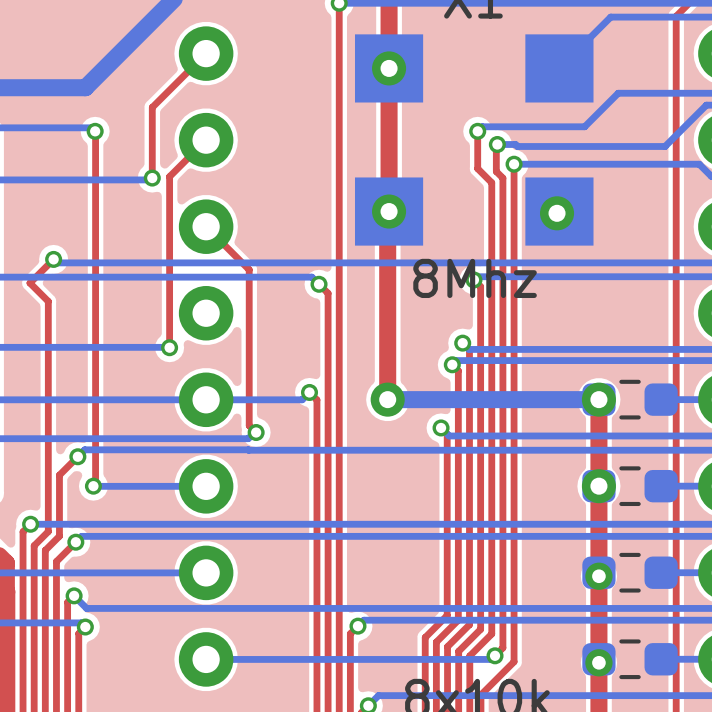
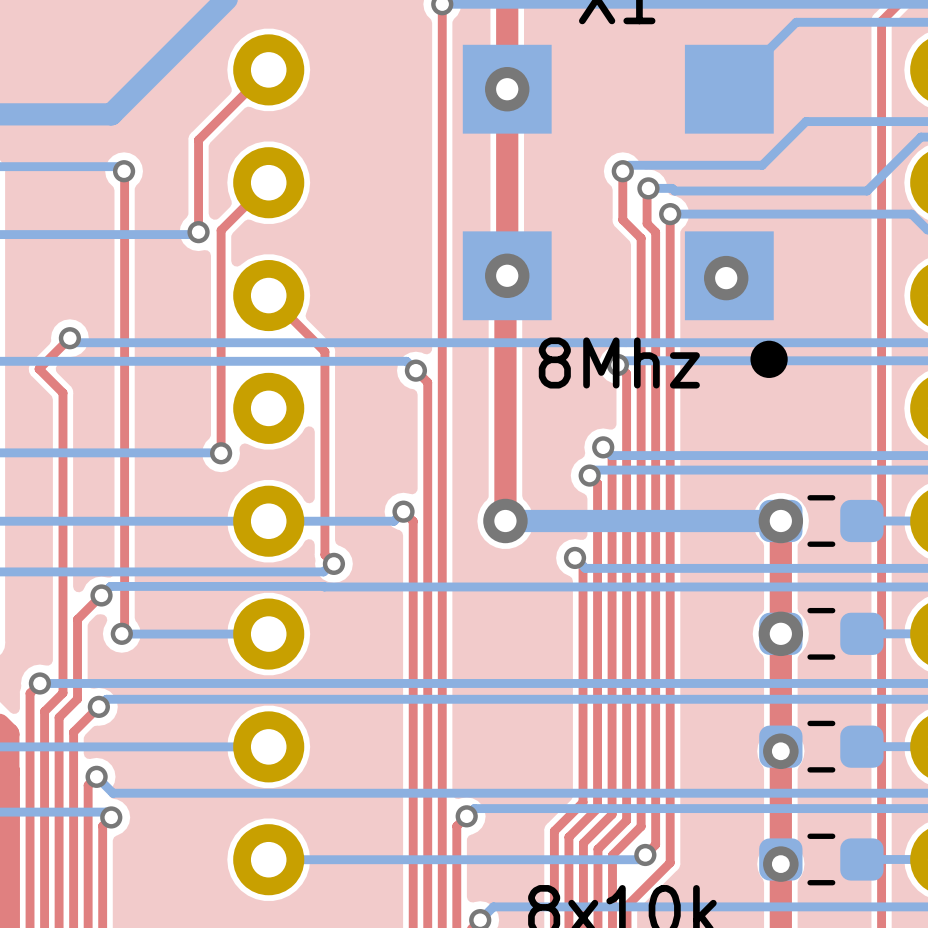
drawing: none -> [750, 340, 788, 378]

